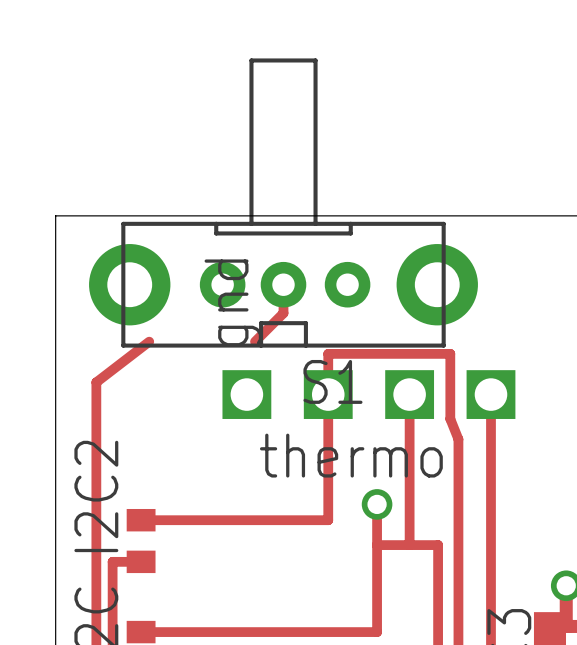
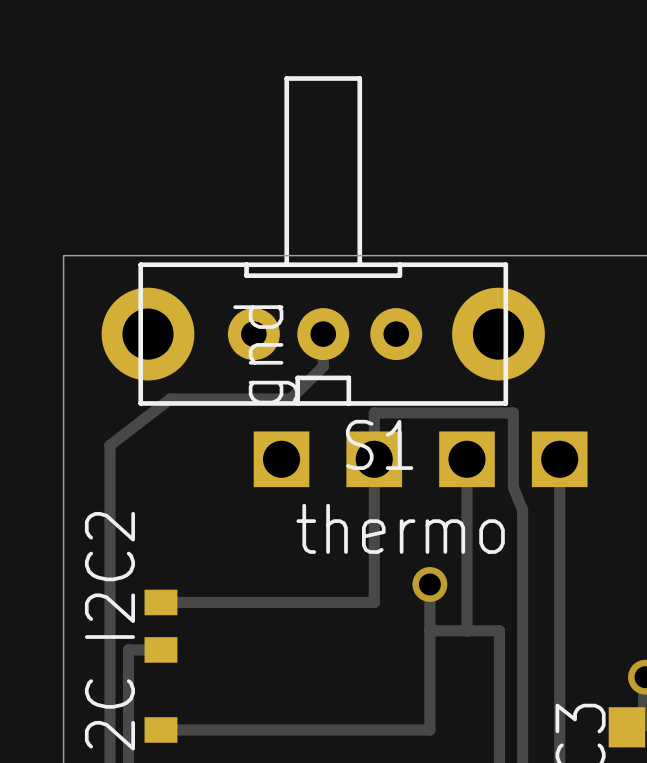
track: none -> (170, 399) (290, 399)

